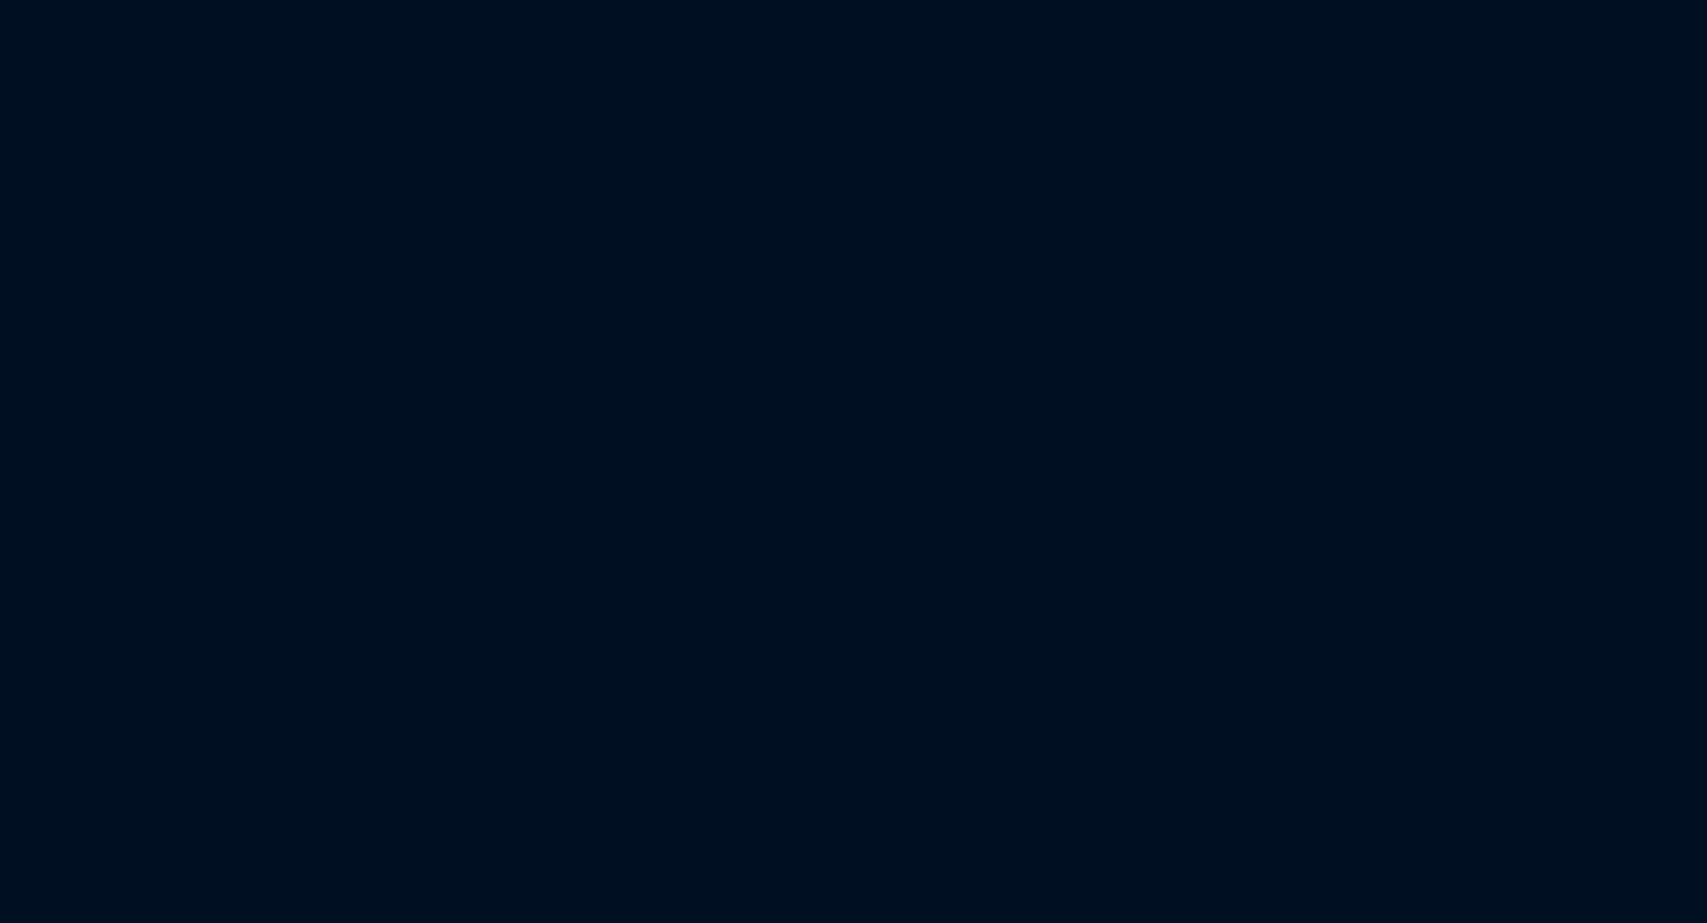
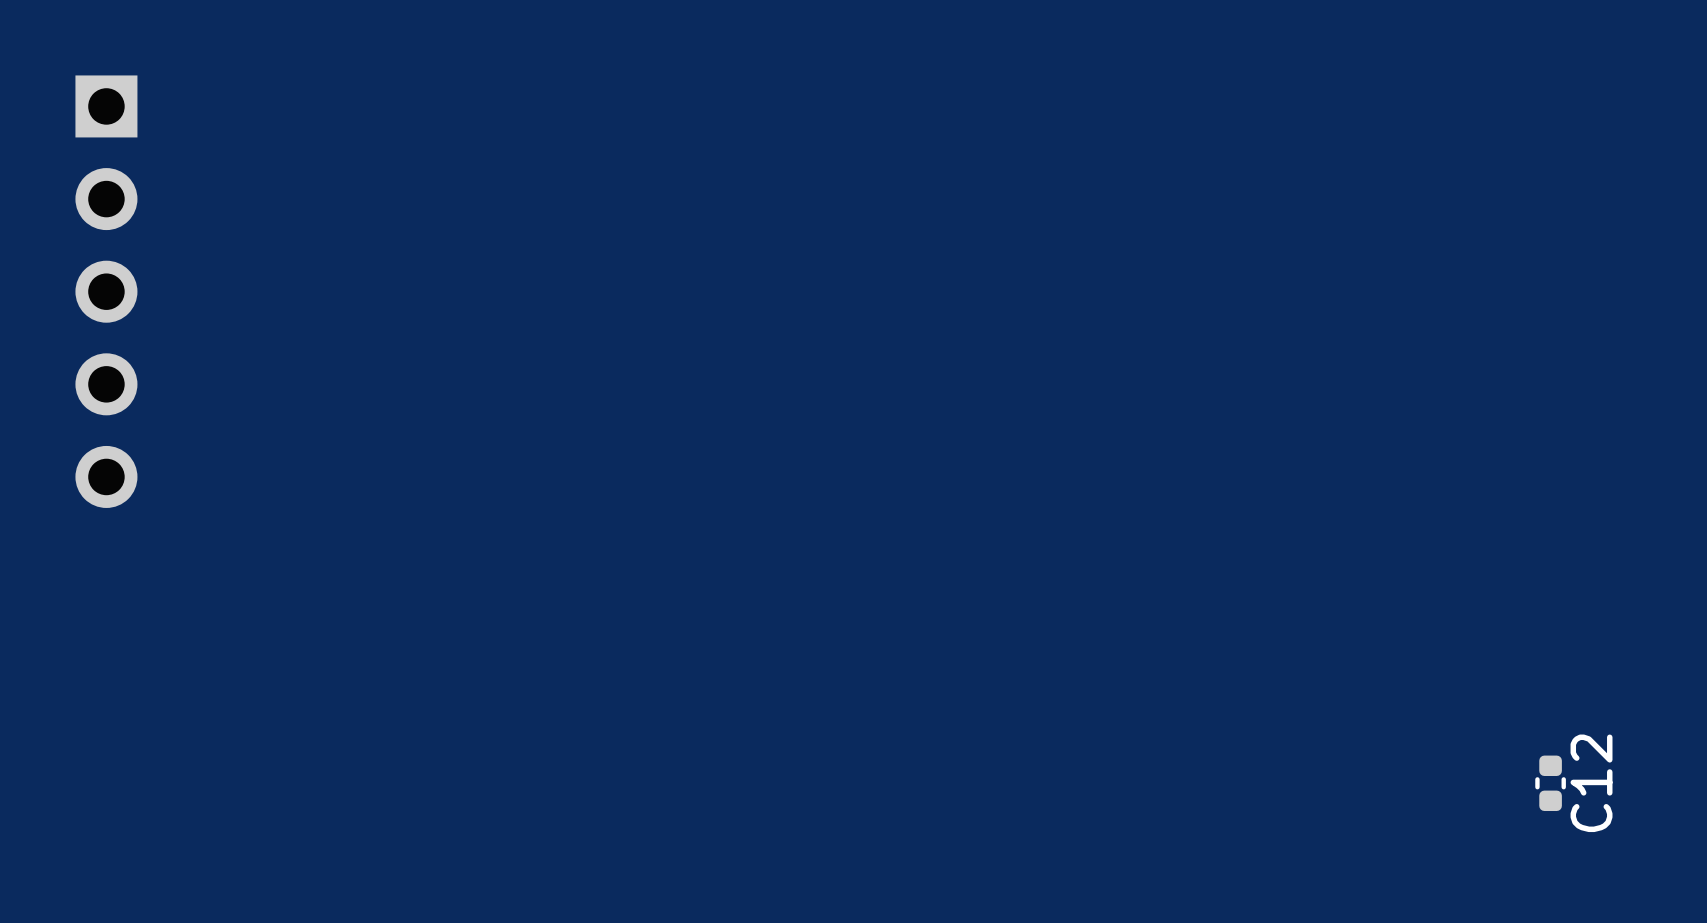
part: none -> (106, 291)
C12: none -> (1550, 783)

